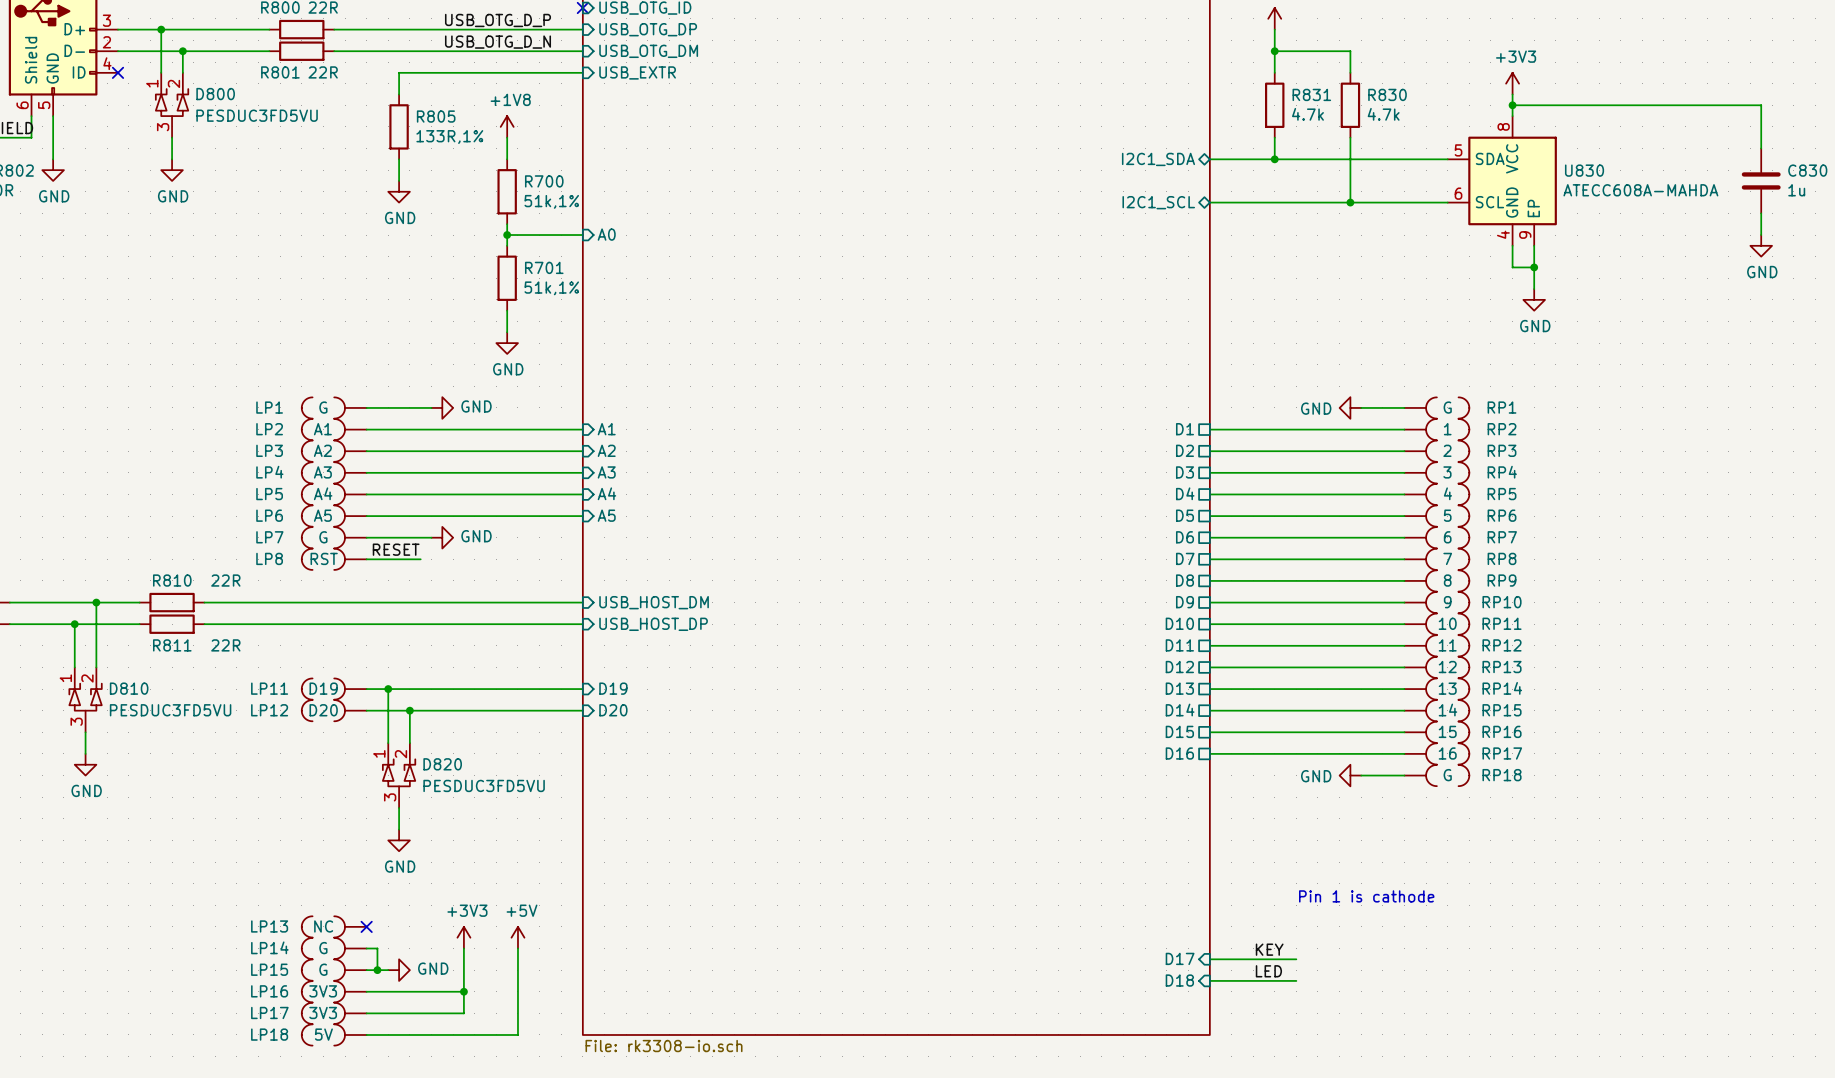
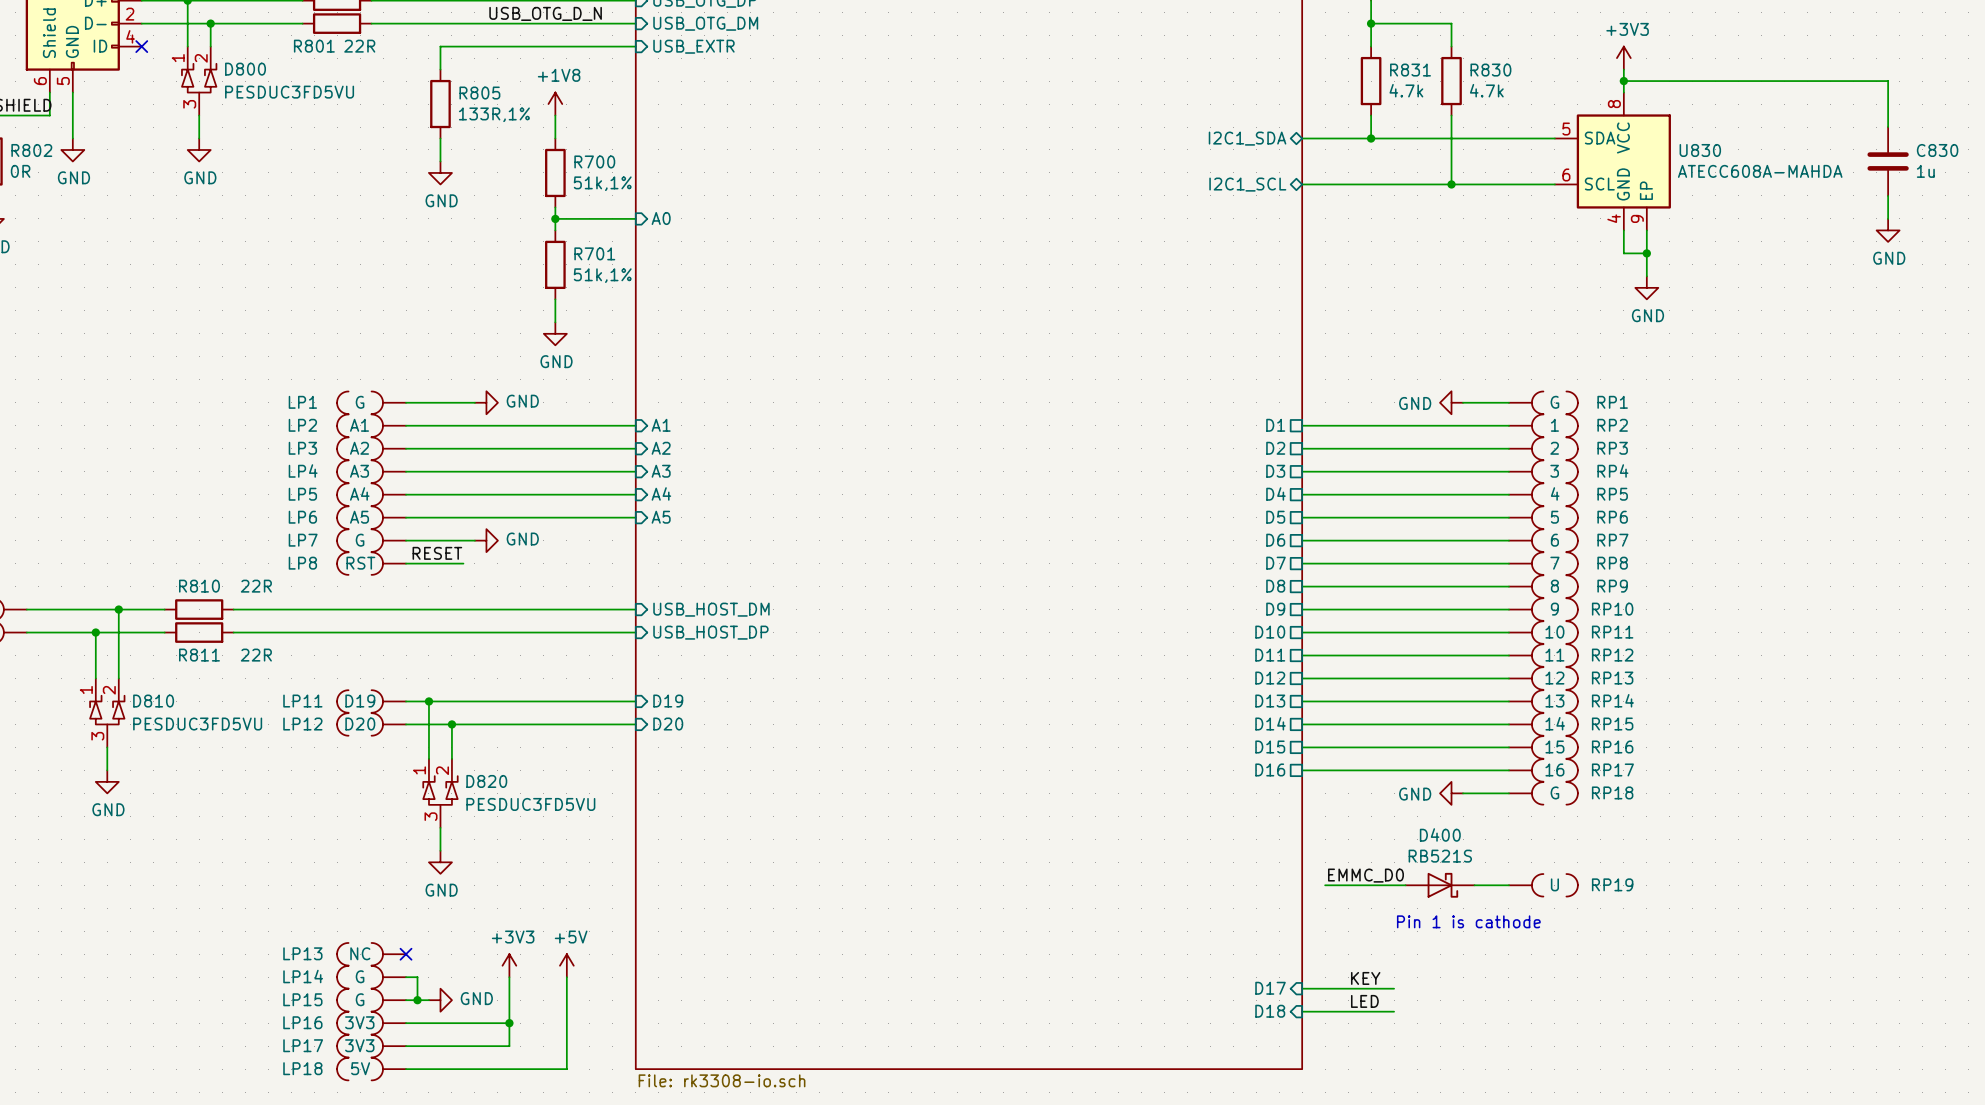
label: none -> EMMC_D0 (1365, 875)
wire: none -> (1325, 885) (1405, 885)
D400: none -> RB521S (1440, 885)
wire: none -> (1474, 885) (1508, 885)
RP19: none -> U (1543, 885)

